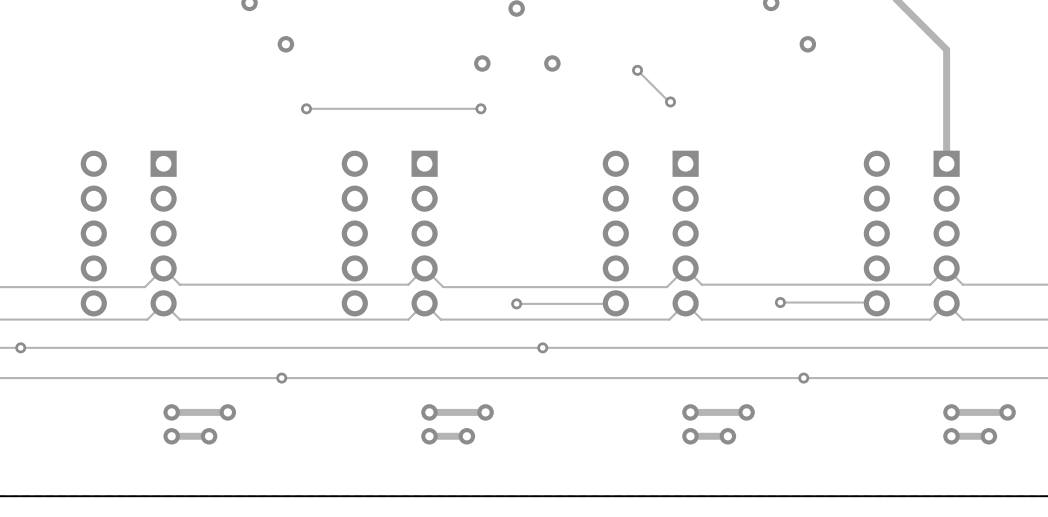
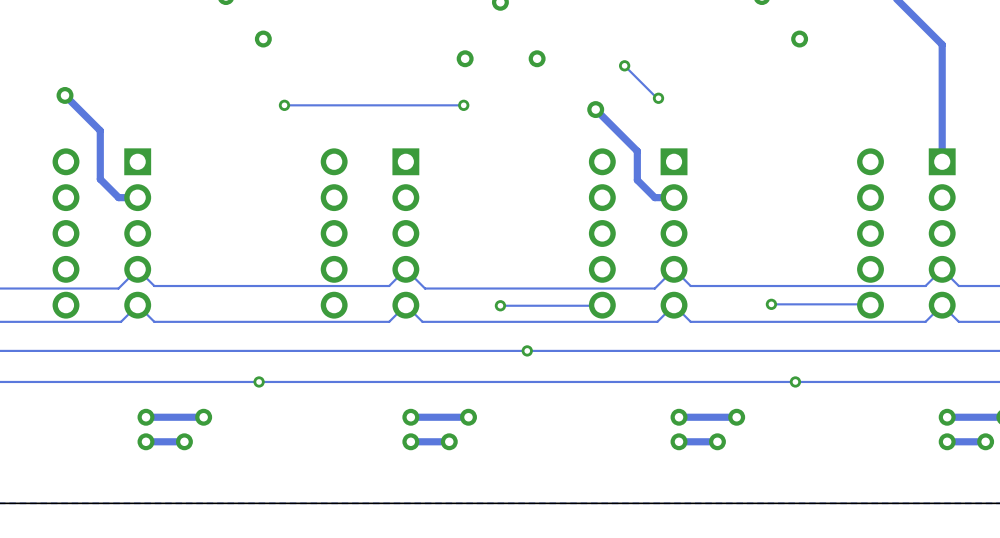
track: none -> (65, 95) (100, 130) (100, 179) (118, 197) (137, 197)
via: none -> (65, 95)
track: none -> (595, 109) (637, 151) (637, 180) (654, 197) (674, 197)
via: none -> (595, 109)

